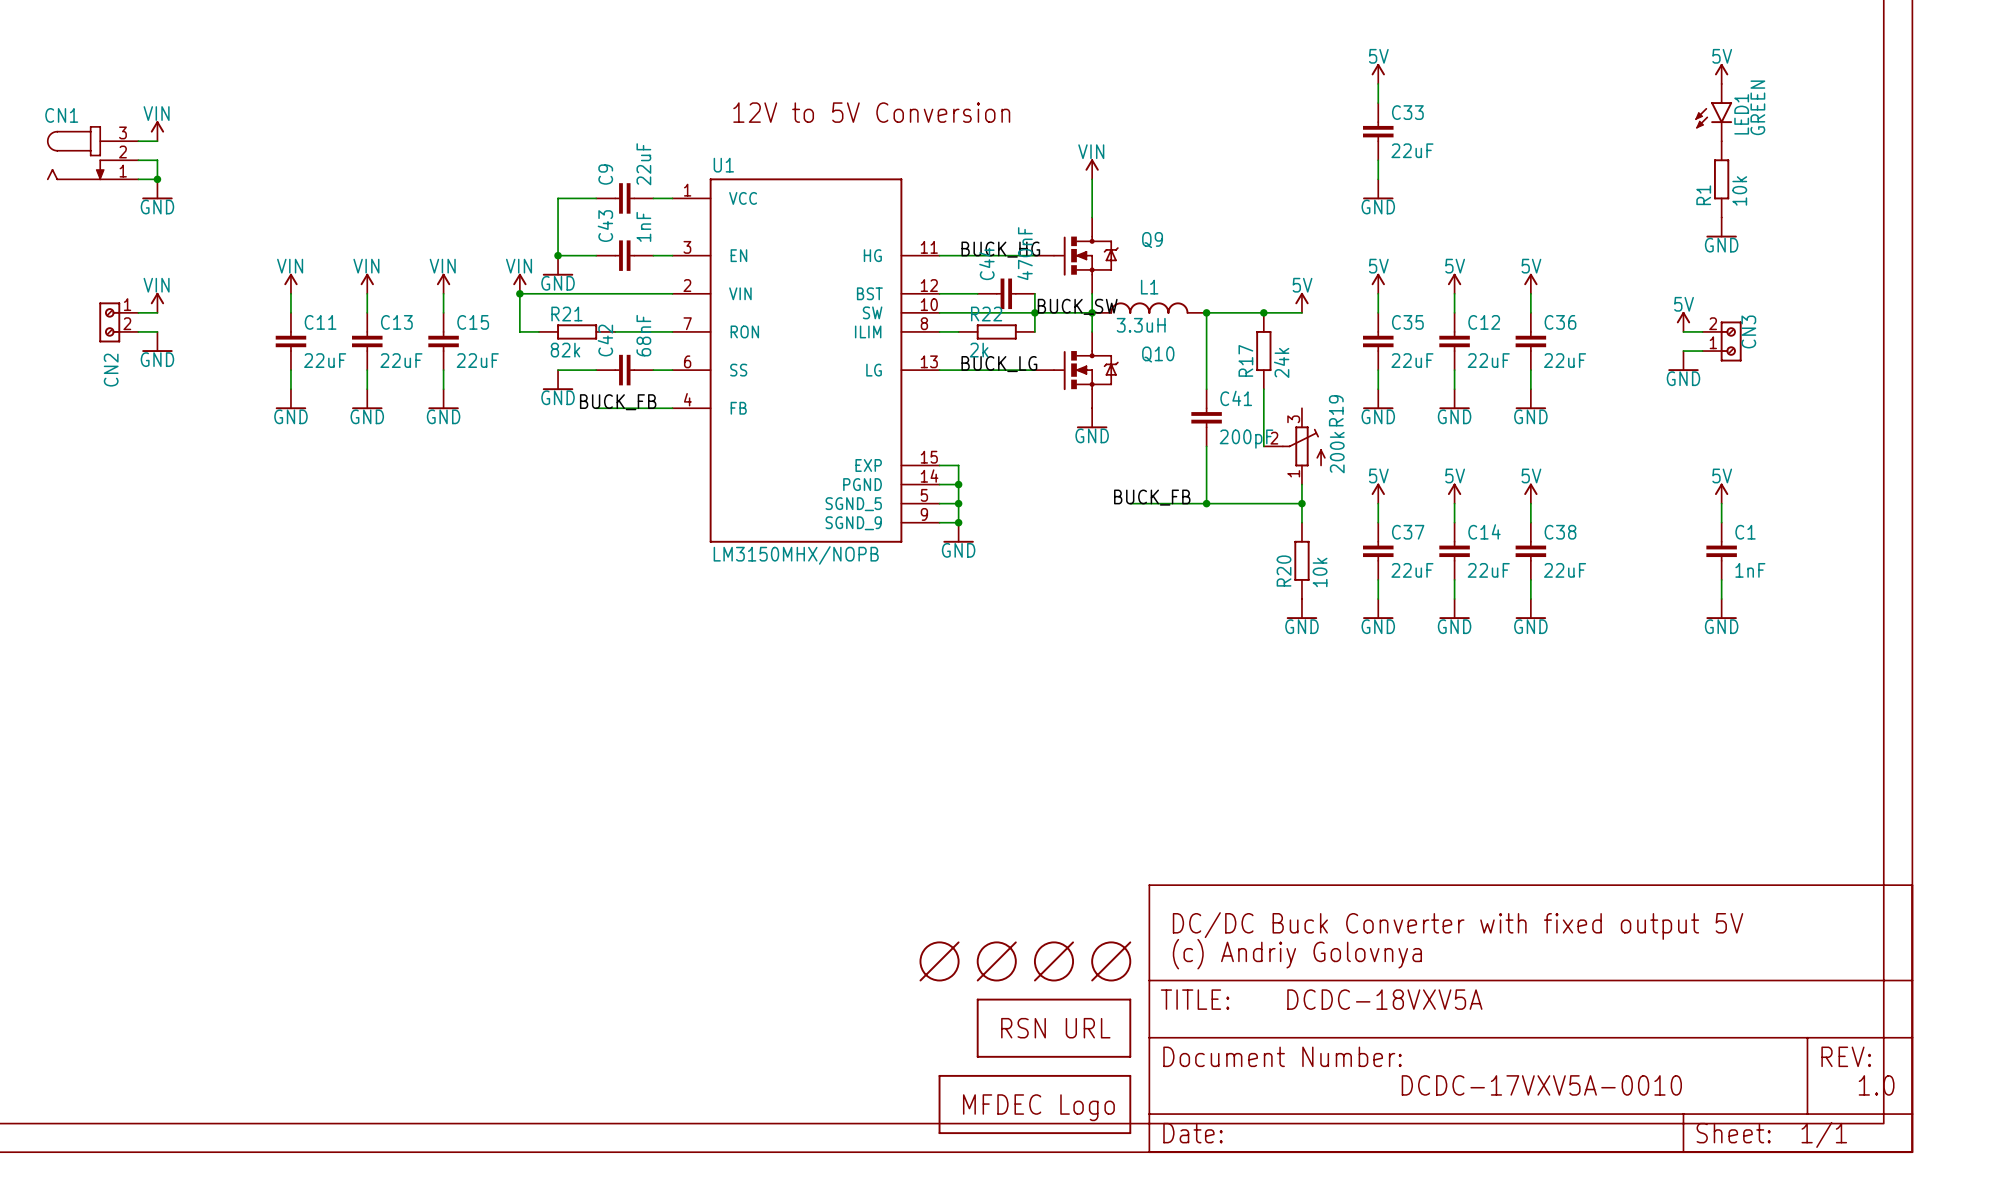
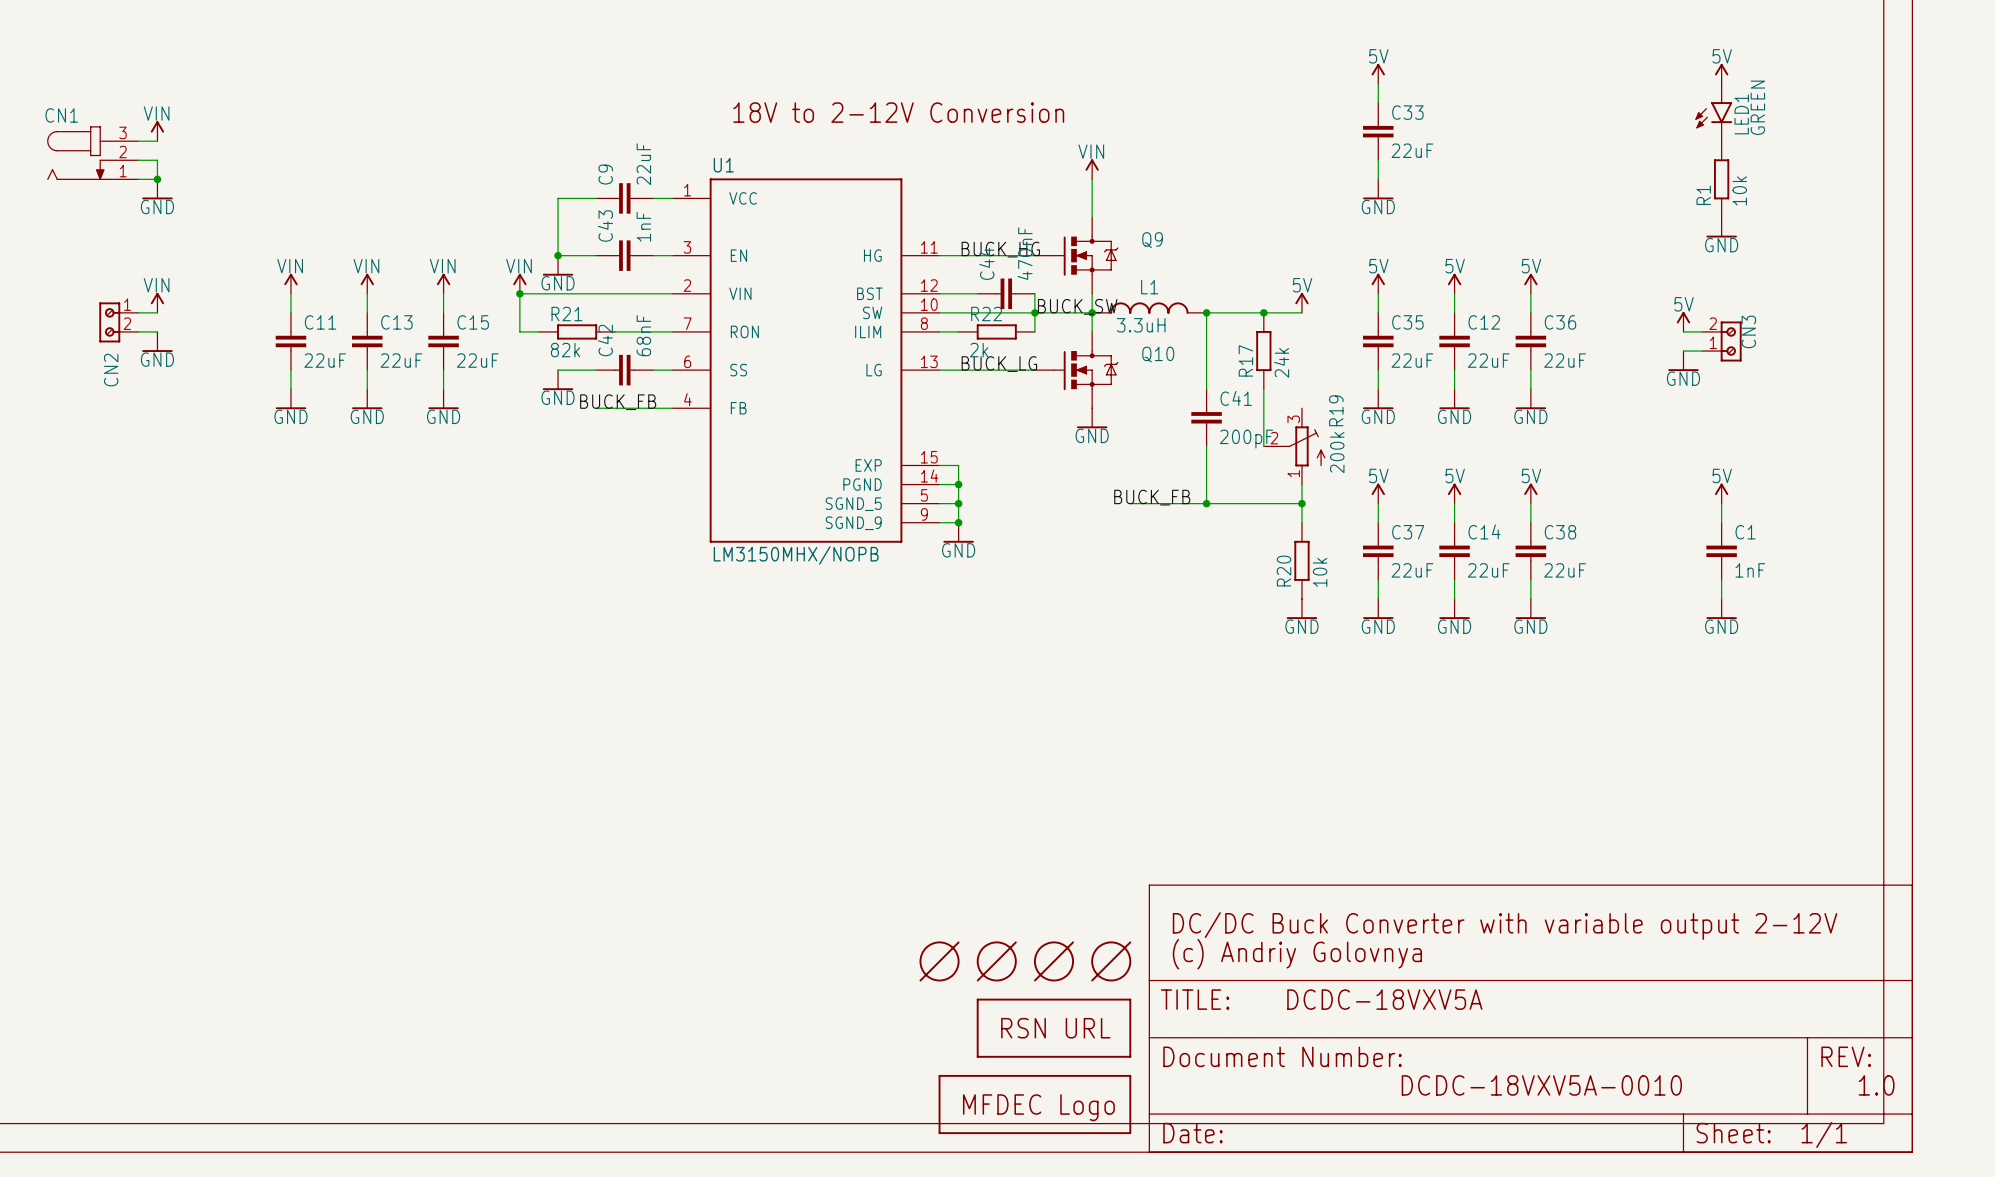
text: 12V to 5V Conversion (871, 112) -> 18V to 2-12V Conversion (898, 112)
text: DC/DC Buck Converter with fixed output 5V (1458, 926) -> DC/DC Buck Converter with variable output 2-12V (1505, 926)
text: DCDC-17VXV5A-0010 (1541, 1085) -> DCDC-18VXV5A-0010 (1541, 1085)

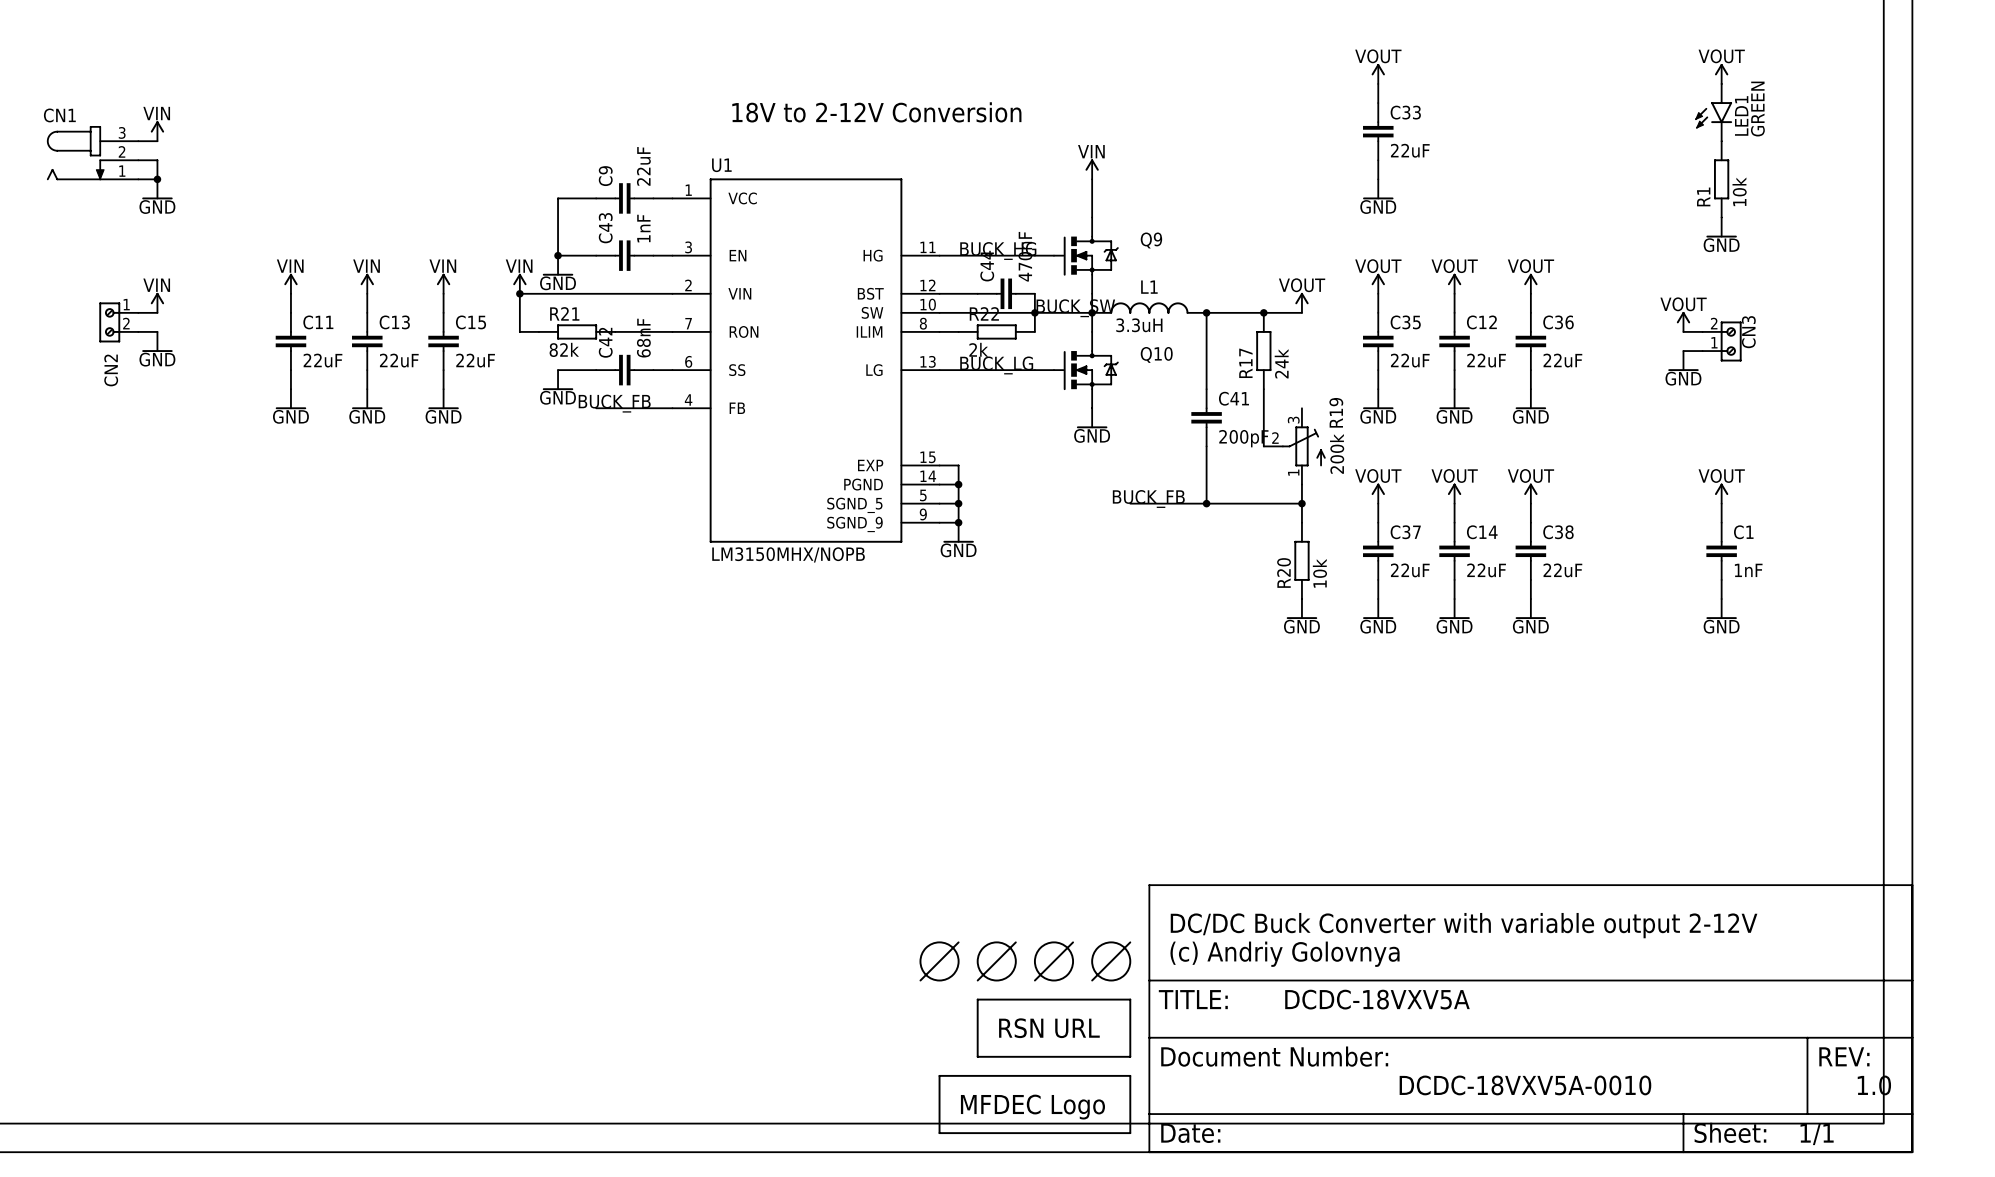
power symbol: 5V (1378, 73) -> VOUT (1378, 73)
power symbol: 5V (1721, 73) -> VOUT (1721, 73)
power symbol: 5V (1378, 283) -> VOUT (1378, 283)
power symbol: 5V (1454, 283) -> VOUT (1454, 283)
power symbol: 5V (1530, 283) -> VOUT (1530, 283)
power symbol: 5V (1301, 302) -> VOUT (1301, 302)
power symbol: 5V (1683, 321) -> VOUT (1683, 321)
power symbol: 5V (1378, 493) -> VOUT (1378, 493)
power symbol: 5V (1454, 493) -> VOUT (1454, 493)
power symbol: 5V (1530, 493) -> VOUT (1530, 493)
power symbol: 5V (1721, 493) -> VOUT (1721, 493)

